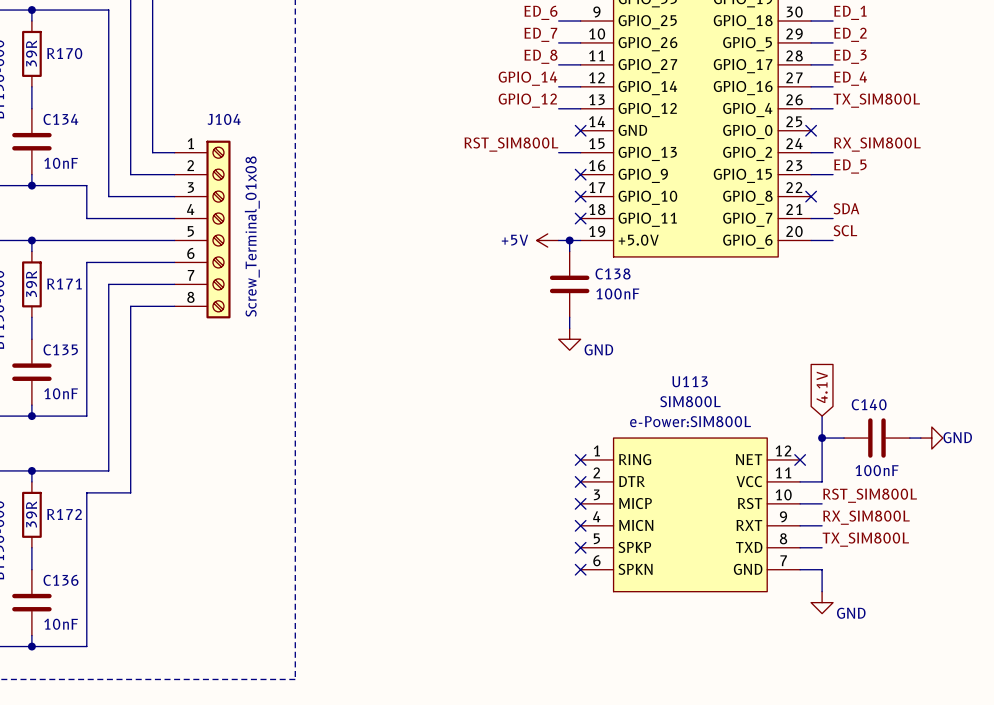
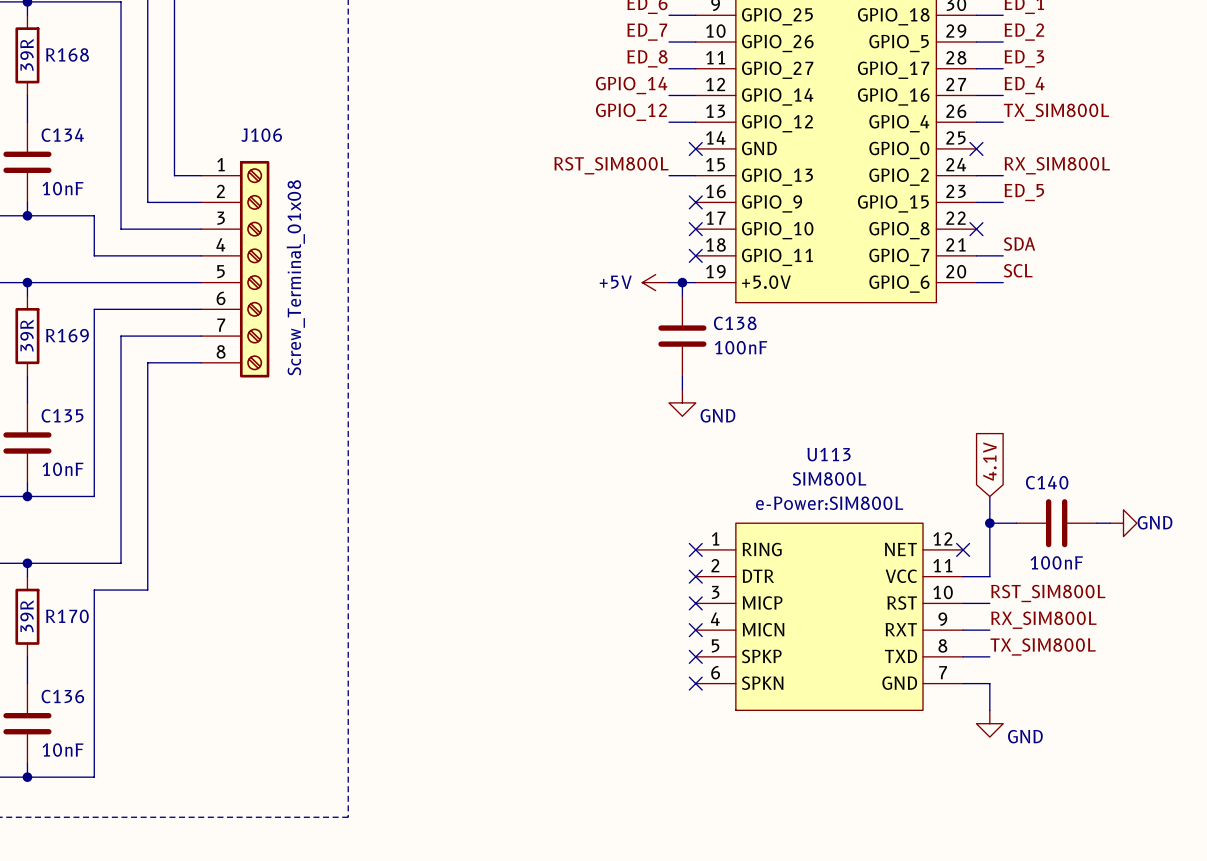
R170 name: R170 (64, 53) -> R168 (67, 54)
J104 name: J104 (224, 119) -> J106 (261, 135)
R171 name: R171 (64, 283) -> R169 (67, 335)
R172 name: R172 (64, 514) -> R170 (67, 616)

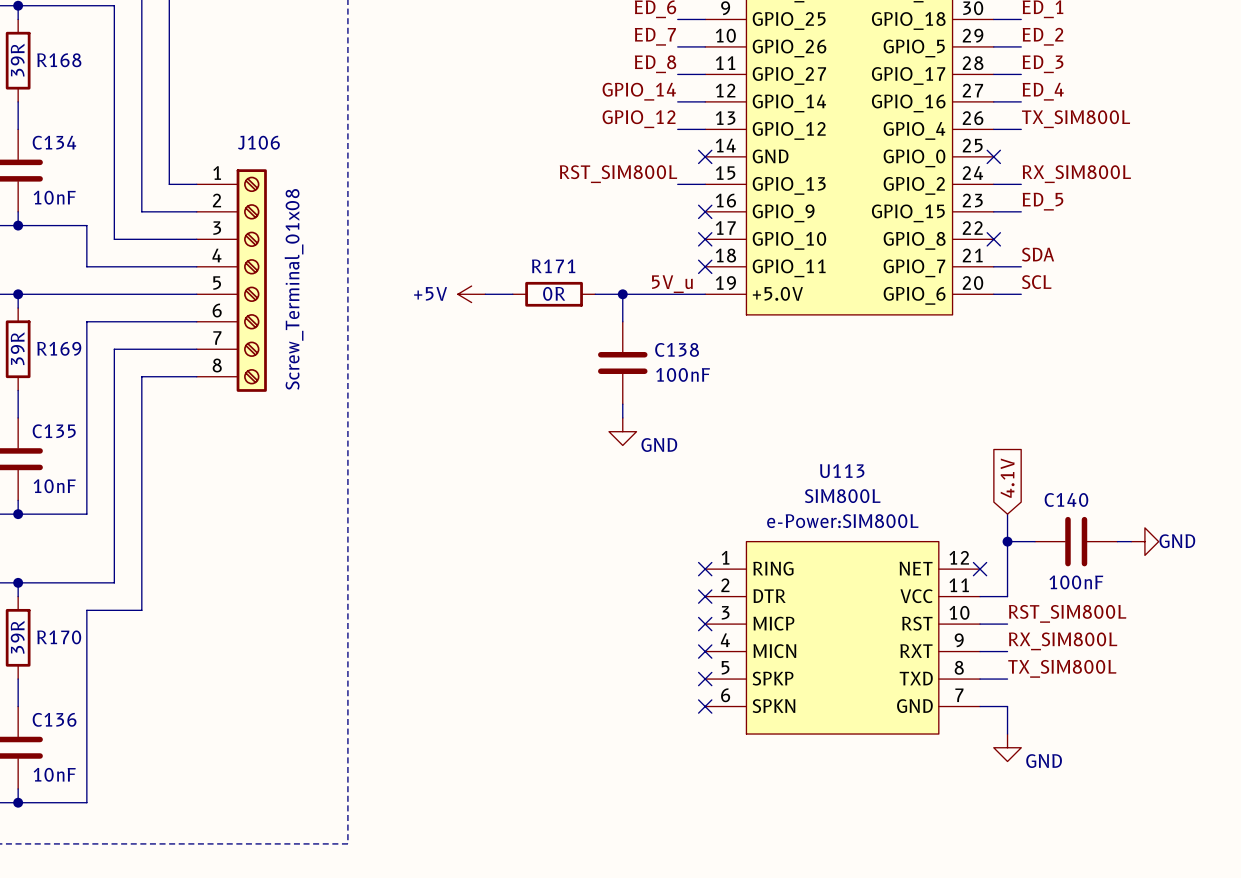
label: none -> 5V_u (672, 284)
wire: none -> (485, 294) (512, 294)
R171: none -> 0R (554, 294)
wire: none -> (595, 294) (677, 294)
wire: none -> (622, 294) (622, 321)
junction: none -> (622, 294)
power symbol position: +5V (655, 282) -> +5V (471, 294)
wire: (682, 282) (682, 295) -> none
junction: (682, 282) -> none
C138 position: (682, 336) -> (622, 362)
wire: (682, 376) (682, 389) -> (622, 404) (622, 417)
power symbol position: GND (682, 402) -> GND (622, 431)

